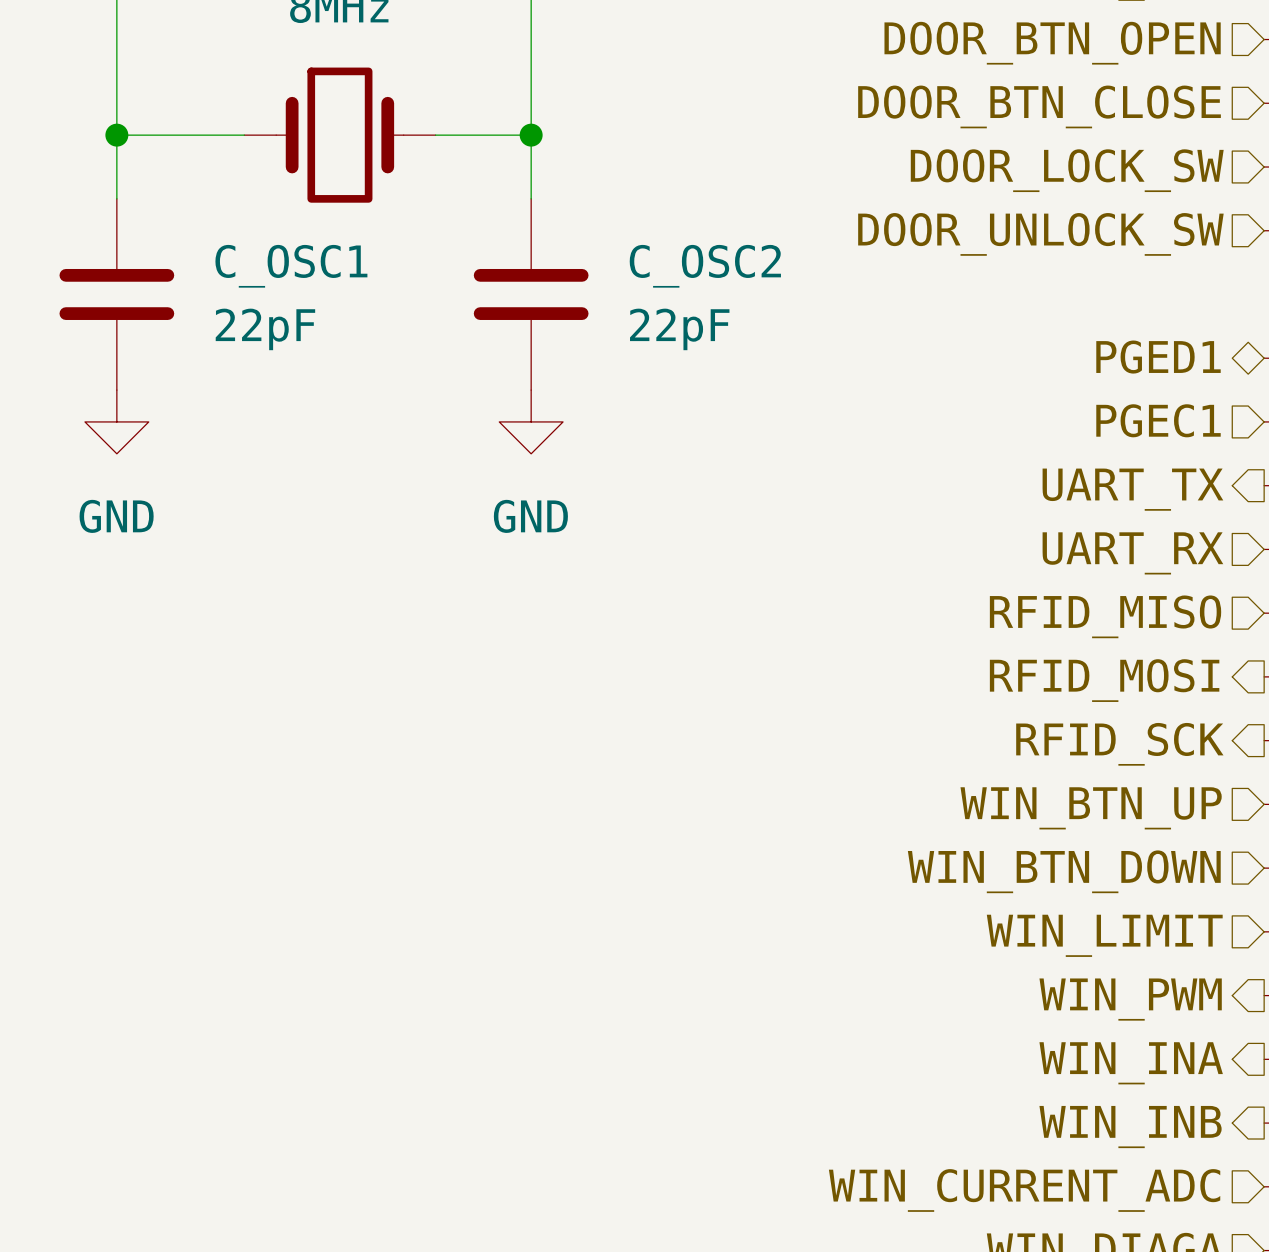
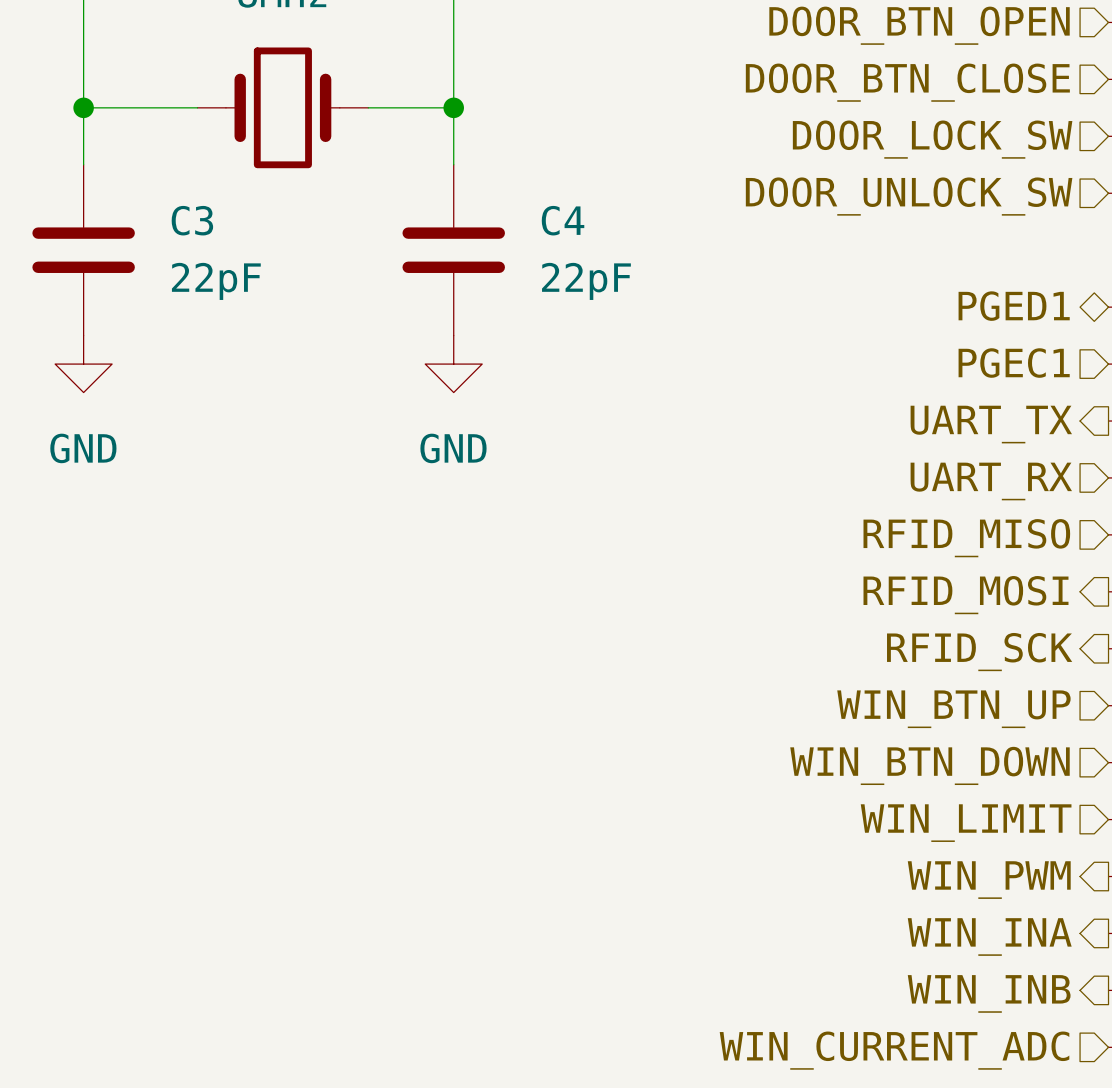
C_OSC1 name: C_OSC1 (291, 266) -> C3 (192, 220)
C_OSC2 name: C_OSC2 (705, 266) -> C4 (563, 220)

